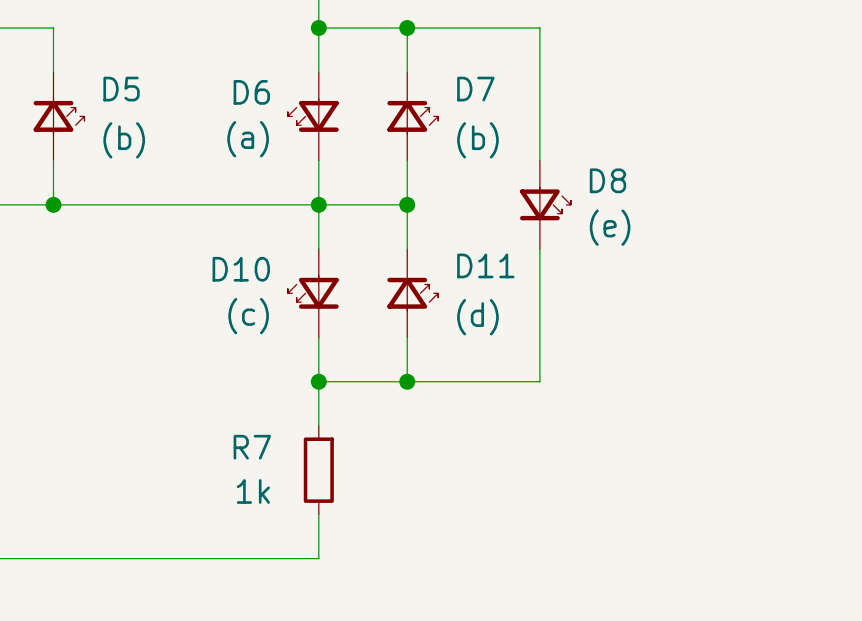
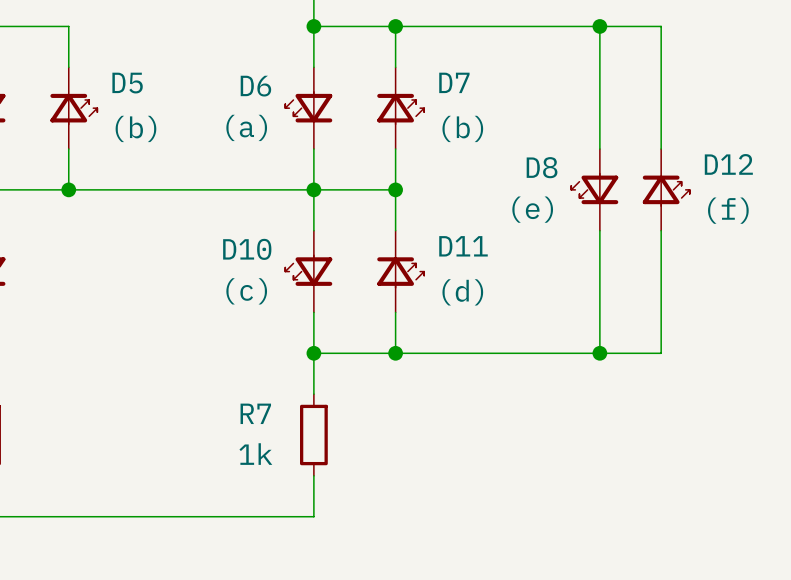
wire: (539, 27) (539, 160) -> (518, 26) (661, 26) (661, 149)
wire: none -> (599, 26) (599, 149)
junction: none -> (599, 26)
D8 flip: as is (545, 203) -> left-right (594, 188)
D8 position: (545, 204) -> (594, 189)
D12: none -> (f) (666, 189)
wire: (539, 249) (539, 381) -> (661, 230) (661, 353) (518, 353)
wire: none -> (599, 230) (599, 353)
junction: none -> (599, 353)

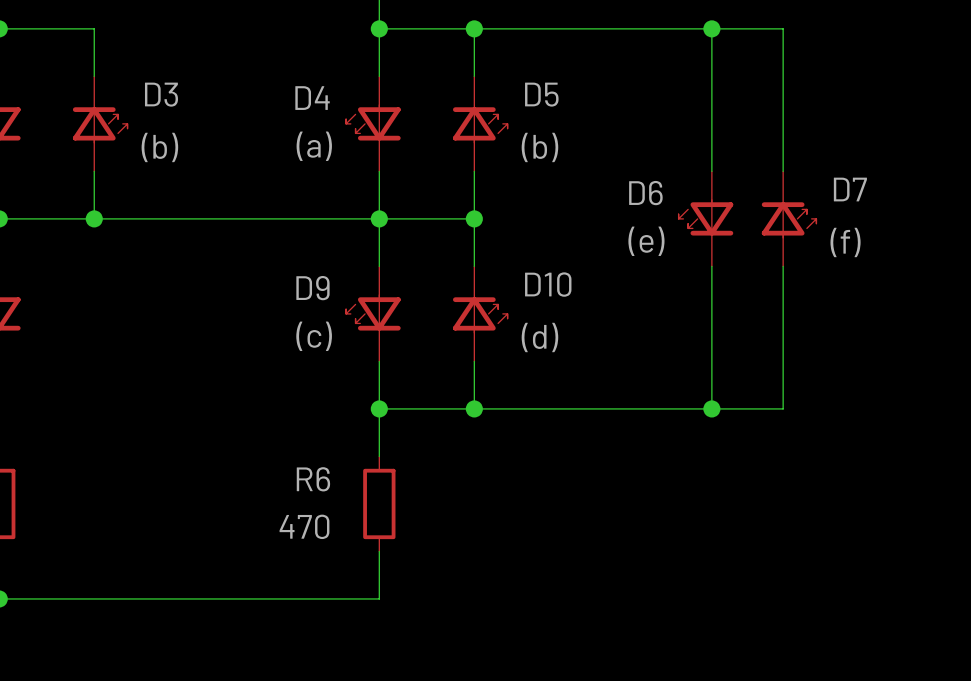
D7 name: D7 (454, 82) -> D5 (541, 94)
D5 name: D5 (127, 83) -> D3 (161, 94)
D6 name: D6 (255, 86) -> D4 (312, 98)
D12 name: D12 (728, 164) -> D7 (850, 189)
D8 name: D8 (542, 167) -> D6 (645, 193)
D11 name: D11 (463, 246) -> D10 (548, 284)
D10 name: D10 (247, 249) -> D9 (312, 288)
R7 name: R7 (255, 413) -> R6 (313, 479)
R7 value: 1k (255, 454) -> 470 (304, 526)

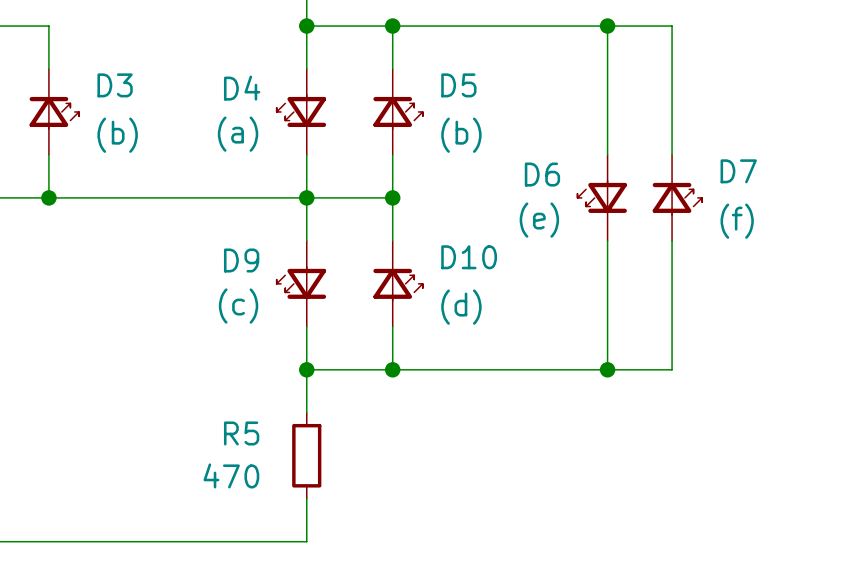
R6 name: R6 (313, 479) -> R5 (241, 433)

